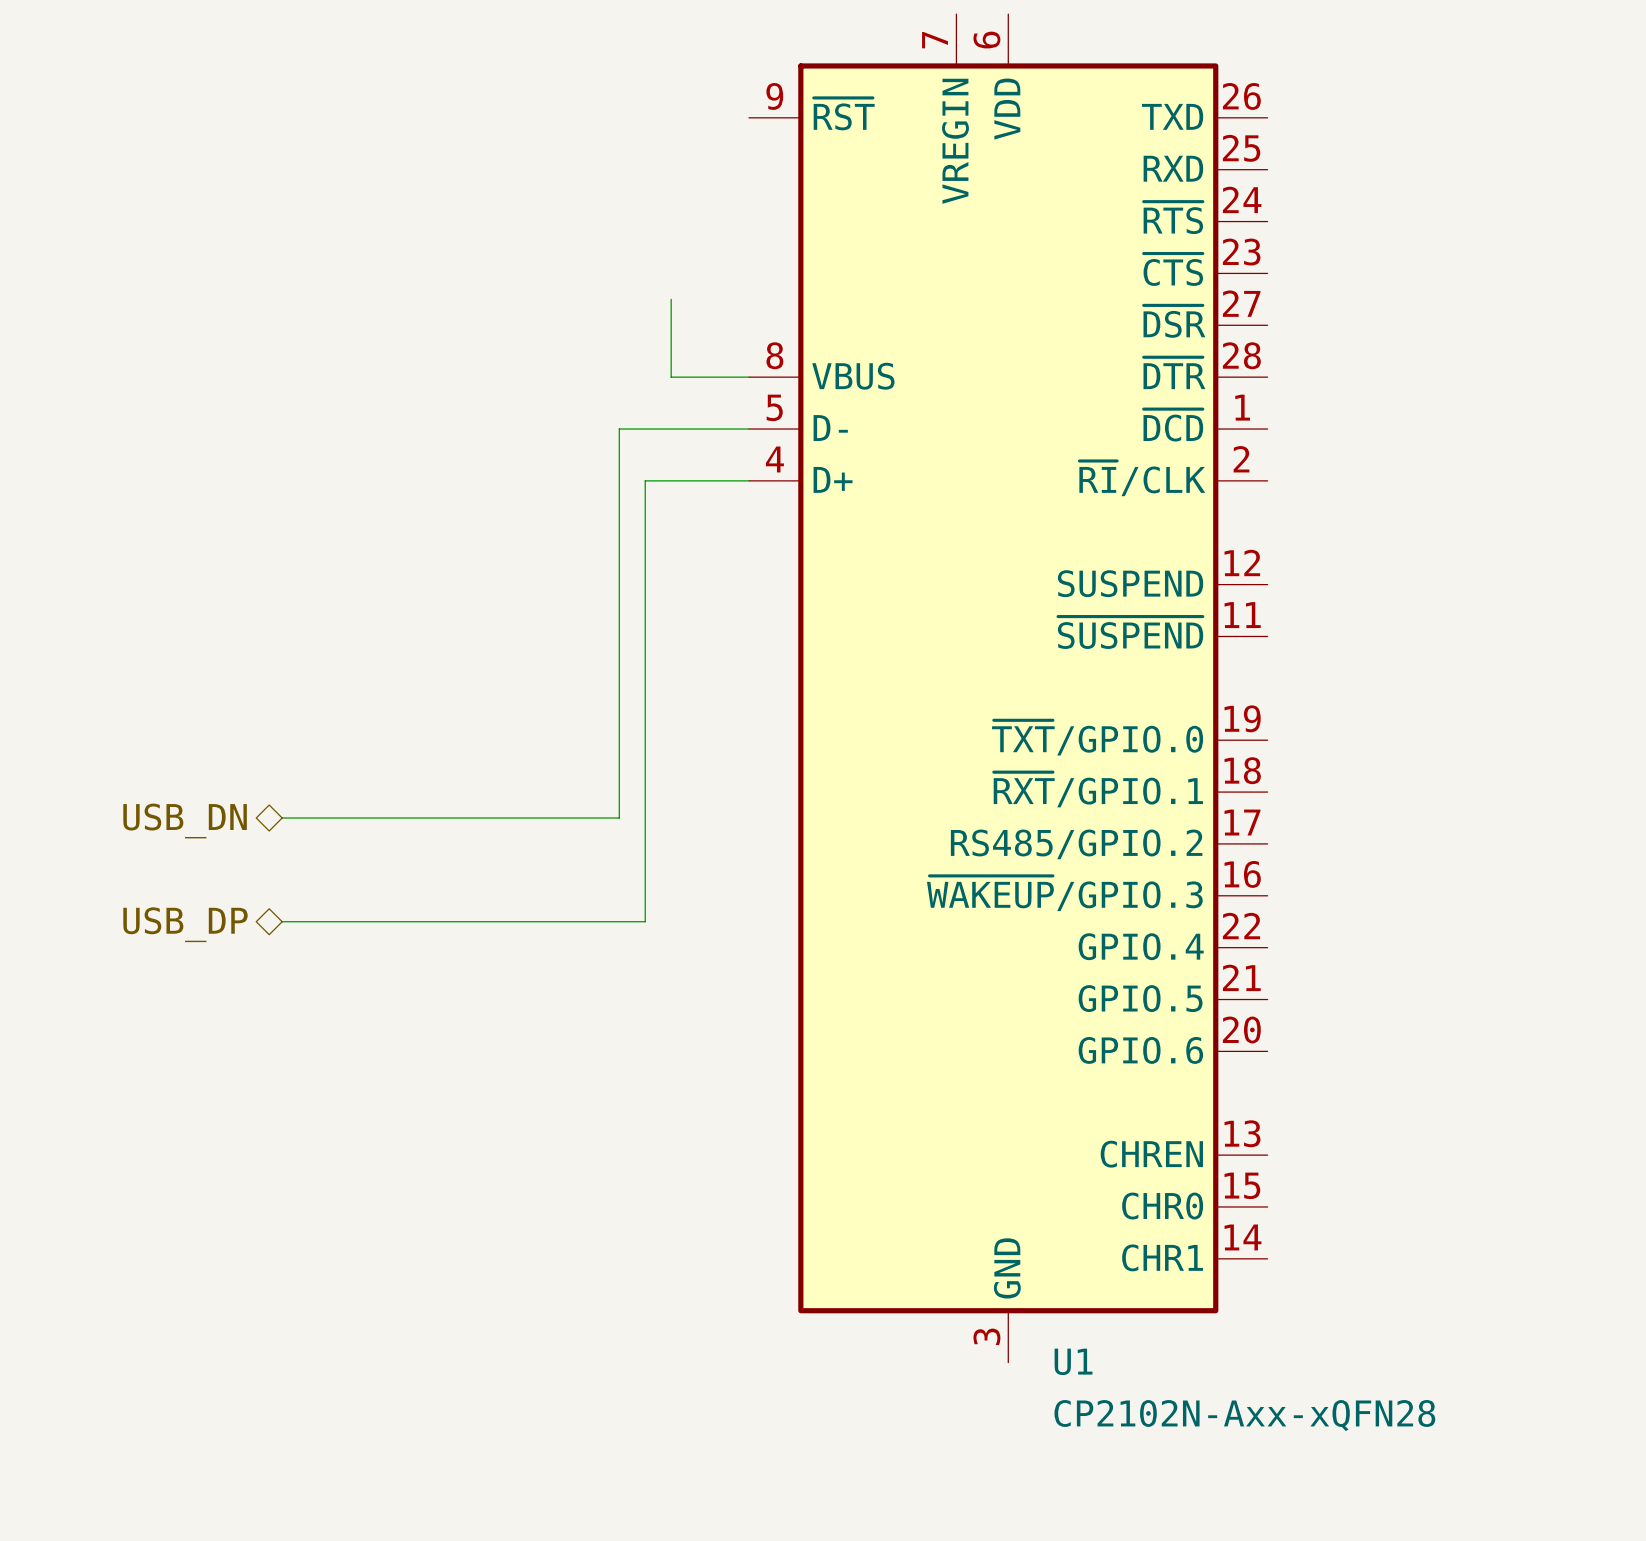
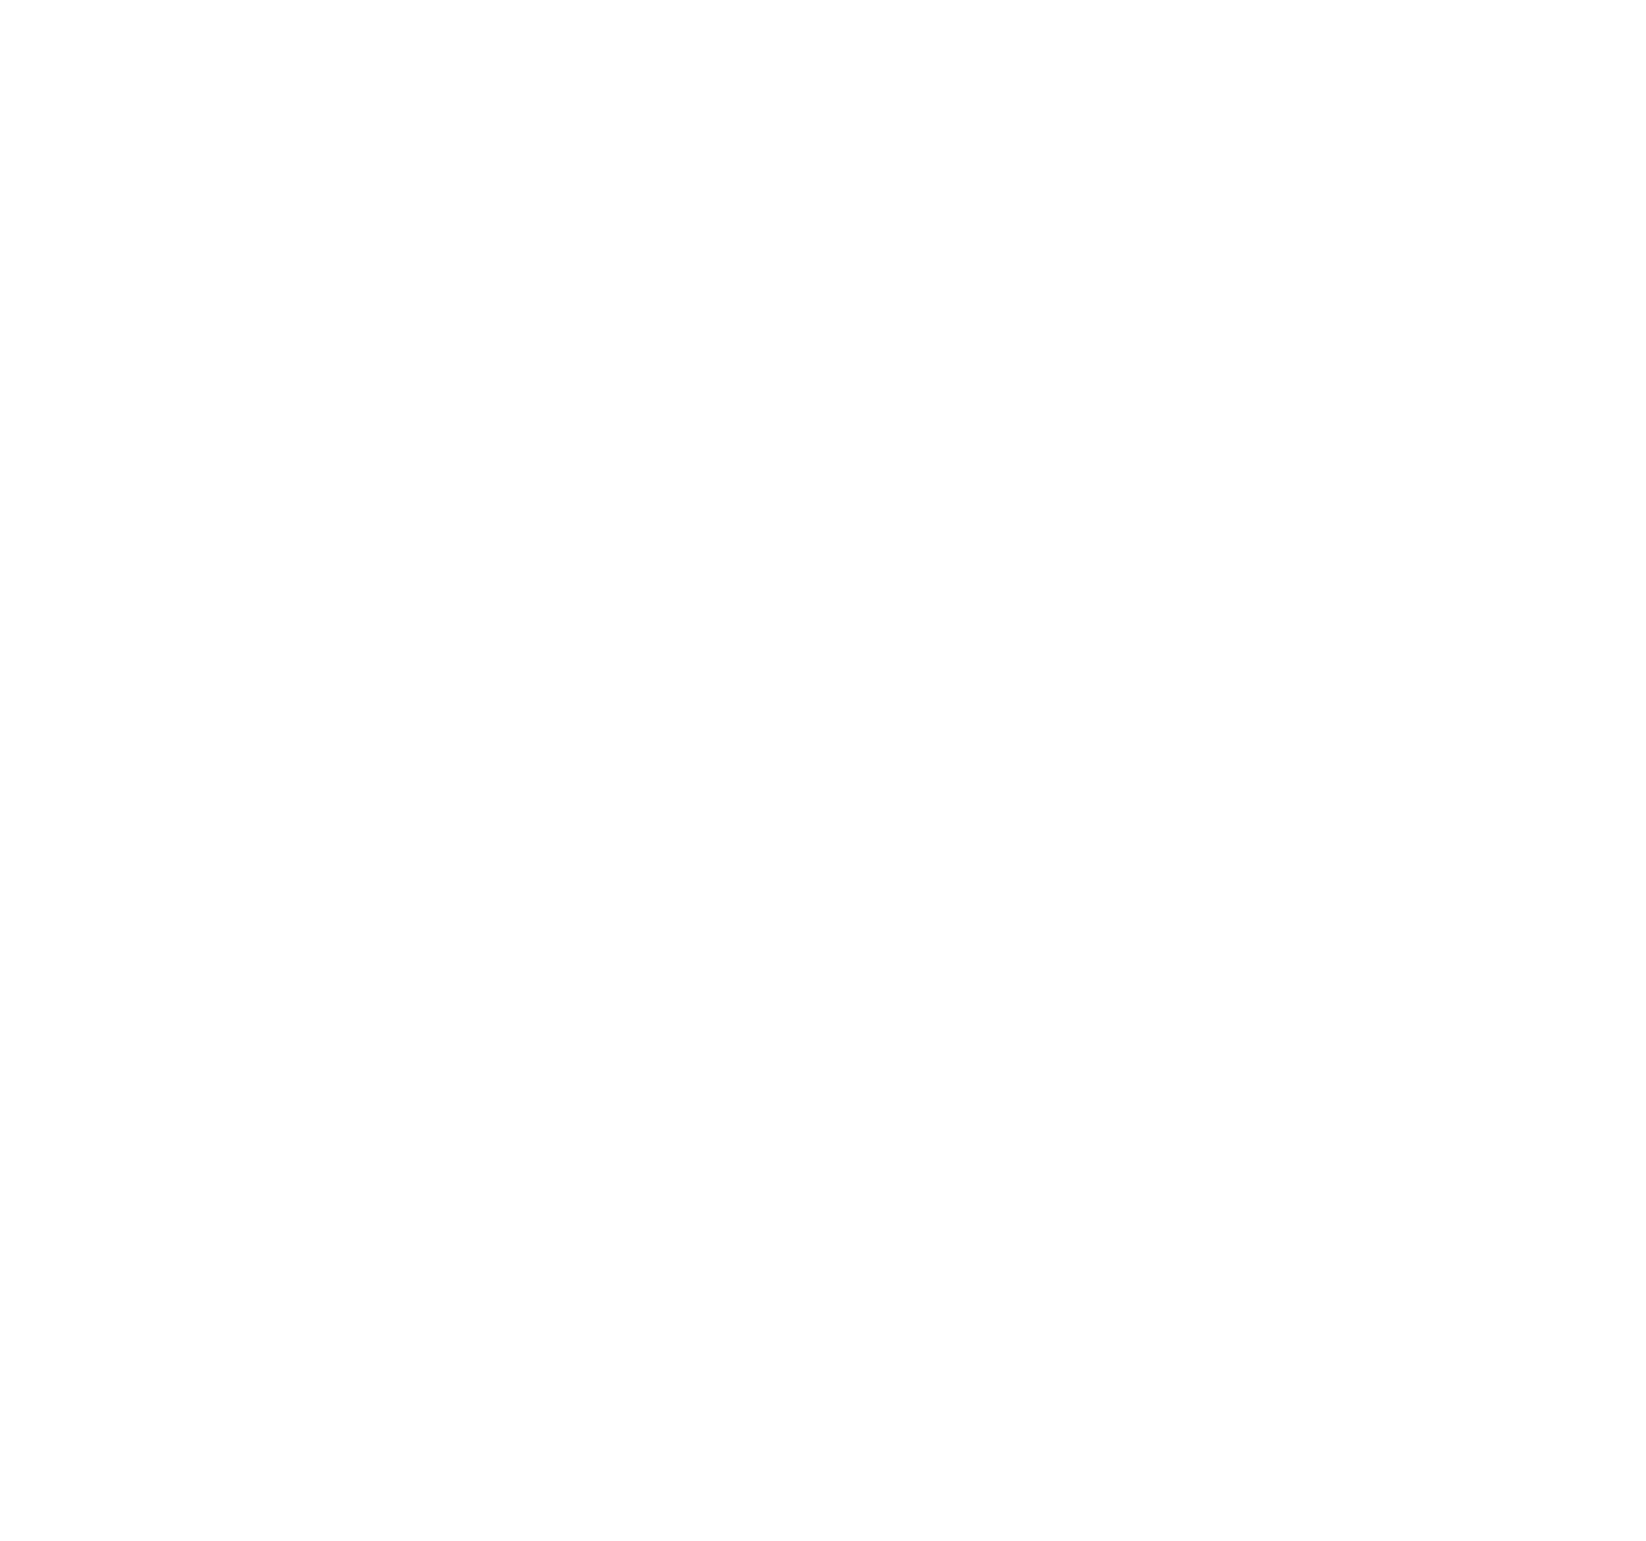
wire: (671, 299) (671, 377) (748, 377) -> none
wire: (748, 429) (619, 429) (619, 818) (282, 818) -> none
wire: (748, 480) (645, 480) (645, 921) (282, 921) -> none
U1: CP2102N-Axx-xQFN28 (1008, 688) -> none
hierarchical label: USB_DN (185, 820) -> none
hierarchical label: USB_DP (185, 924) -> none

